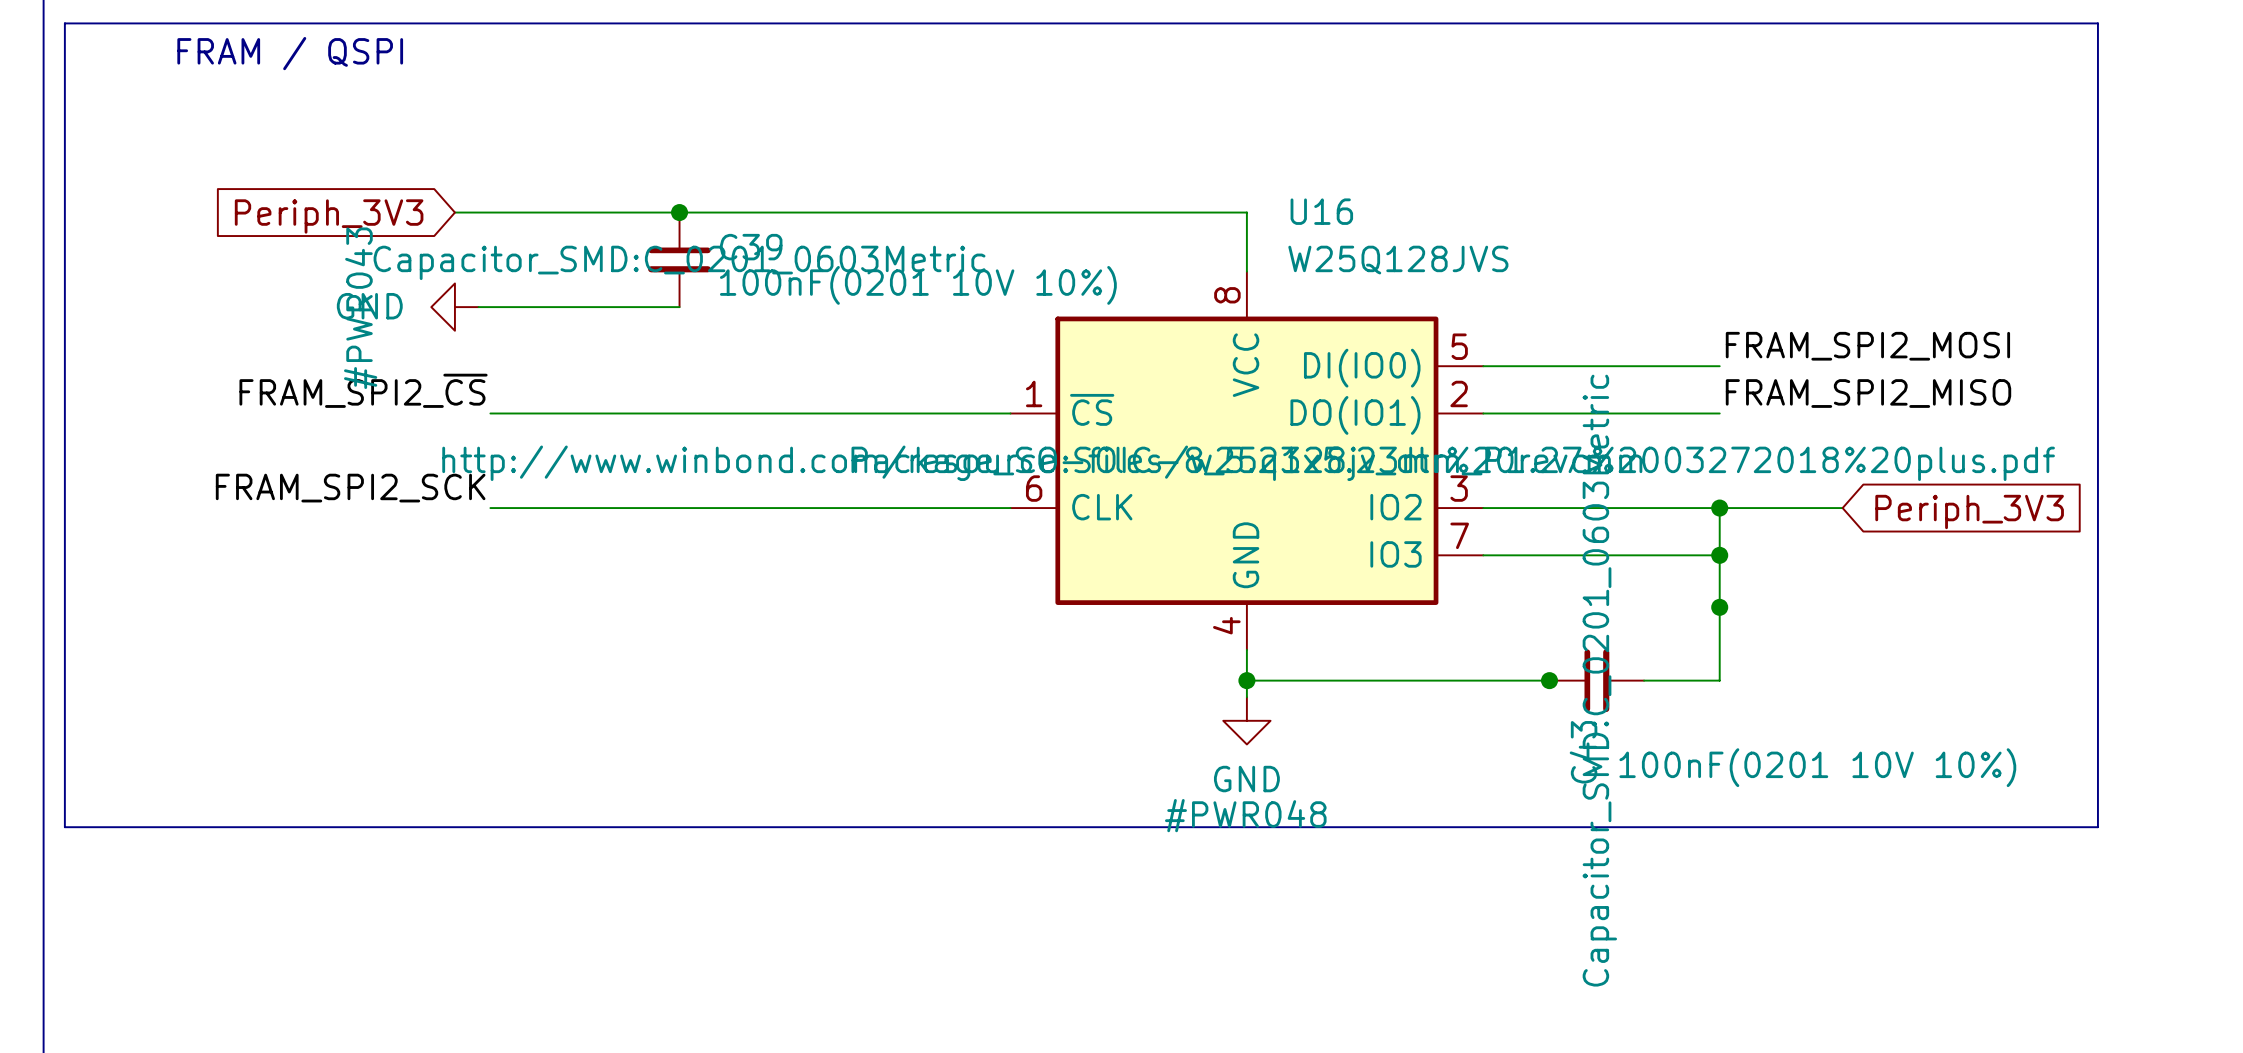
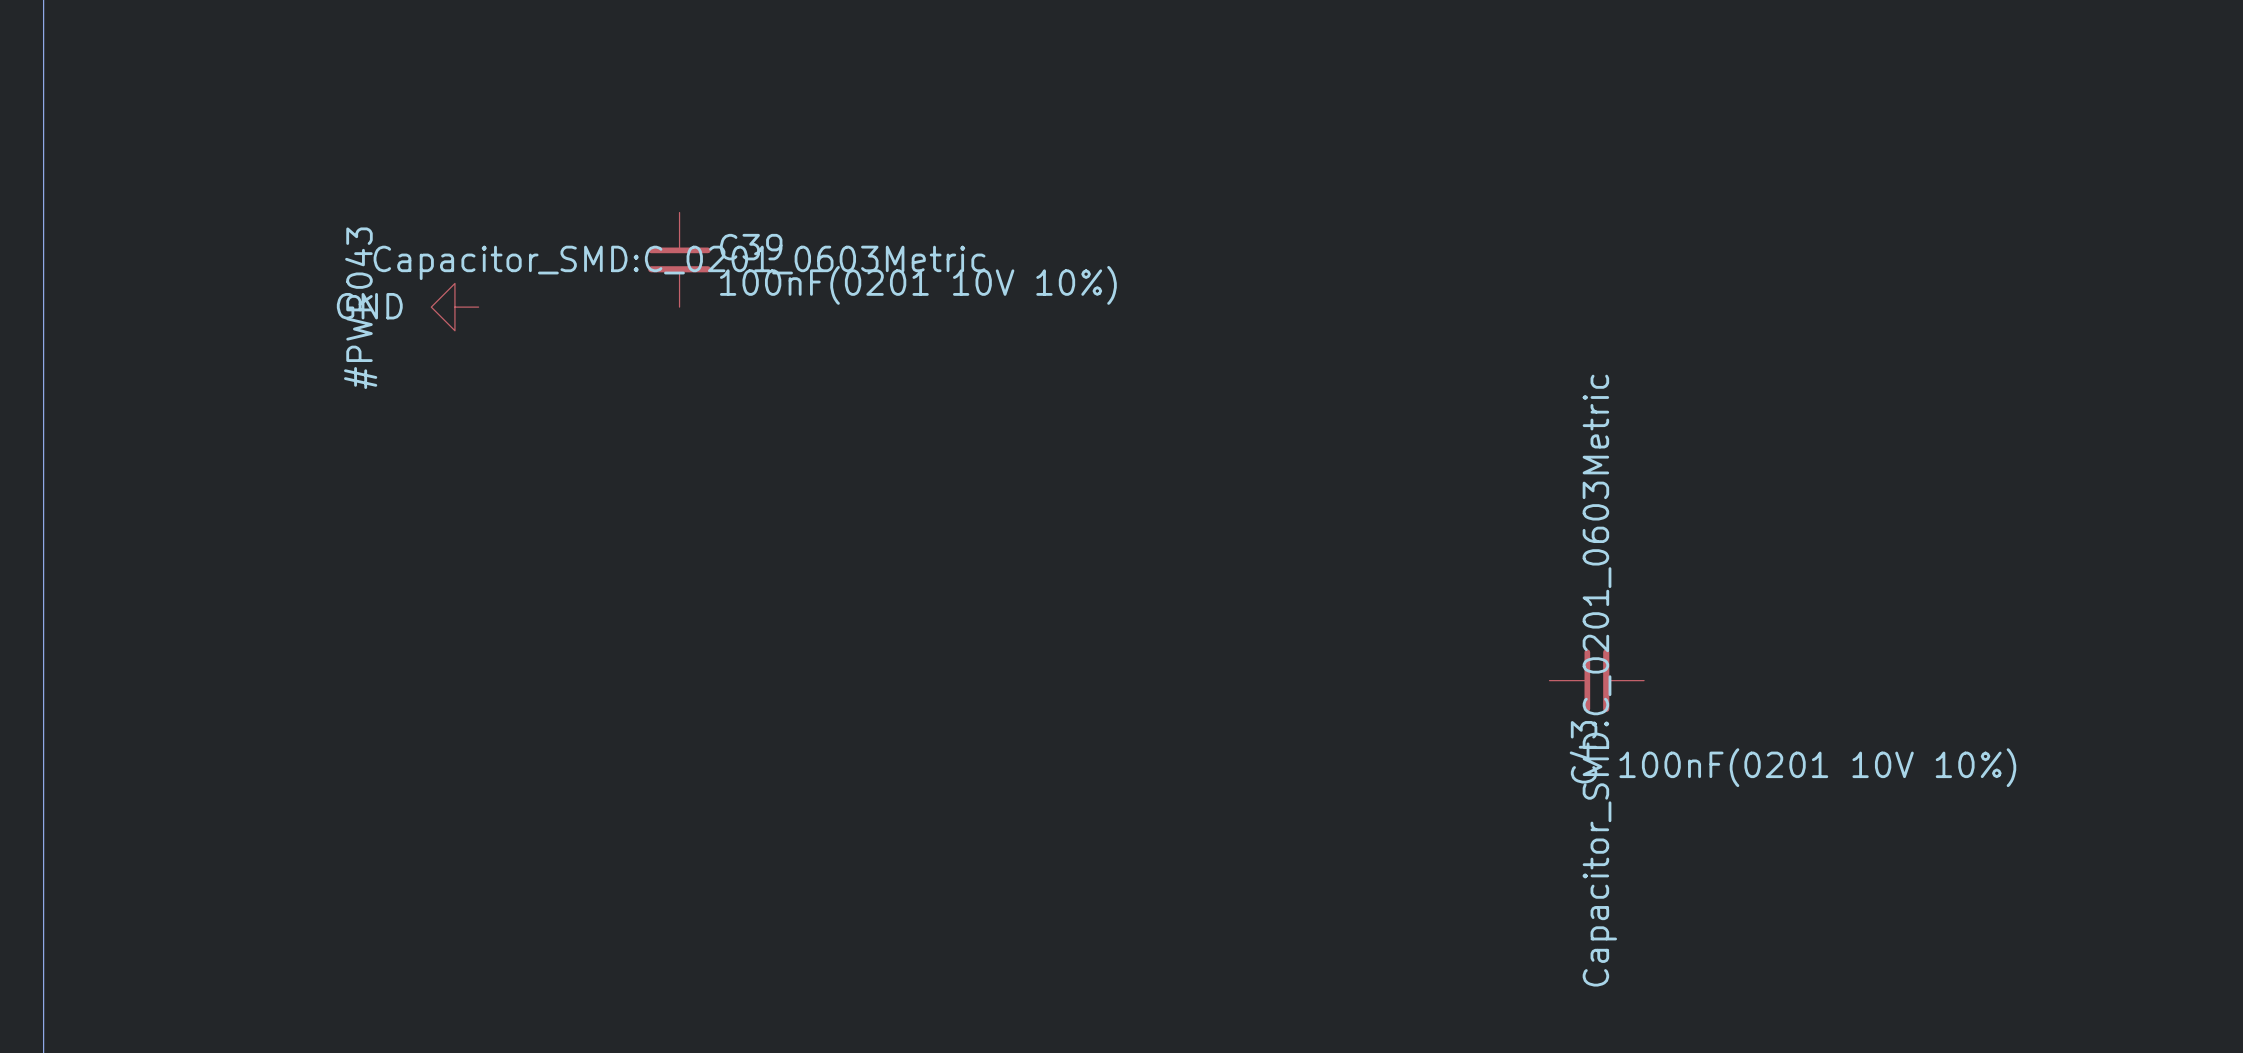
line: (64, 23) (2097, 23) (2097, 827) (64, 827) (64, 23) -> none
text: FRAM / QSPI (290, 53) -> none
wire: (454, 212) (1246, 212) (1246, 271) -> none
junction: (679, 212) -> none
global label: Periph_3V3 (329, 216) -> none
wire: (478, 307) (679, 307) -> none
label: FRAM_SPI2_MOSI (1867, 346) -> none
wire: (1483, 366) (1719, 366) -> none
label: FRAM_SPI2_~{CS} (363, 390) -> none
label: FRAM_SPI2_MISO (1868, 393) -> none
wire: (490, 413) (1010, 413) -> none
wire: (1483, 413) (1719, 413) -> none
U16: W25Q128JVS (1246, 460) -> none
label: FRAM_SPI2_SCK (350, 488) -> none
wire: (490, 508) (1010, 508) -> none
wire: (1483, 508) (1842, 508) -> none
wire: (1719, 508) (1719, 680) (1644, 680) -> none
junction: (1719, 508) -> none
global label: Periph_3V3 (1969, 511) -> none
wire: (1483, 555) (1719, 555) -> none
junction: (1719, 555) -> none
junction: (1719, 607) -> none
wire: (1246, 649) (1246, 697) -> none
wire: (1246, 680) (1551, 680) -> none
junction: (1246, 680) -> none
junction: (1549, 680) -> none
#PWR048: GND (1246, 720) -> none

